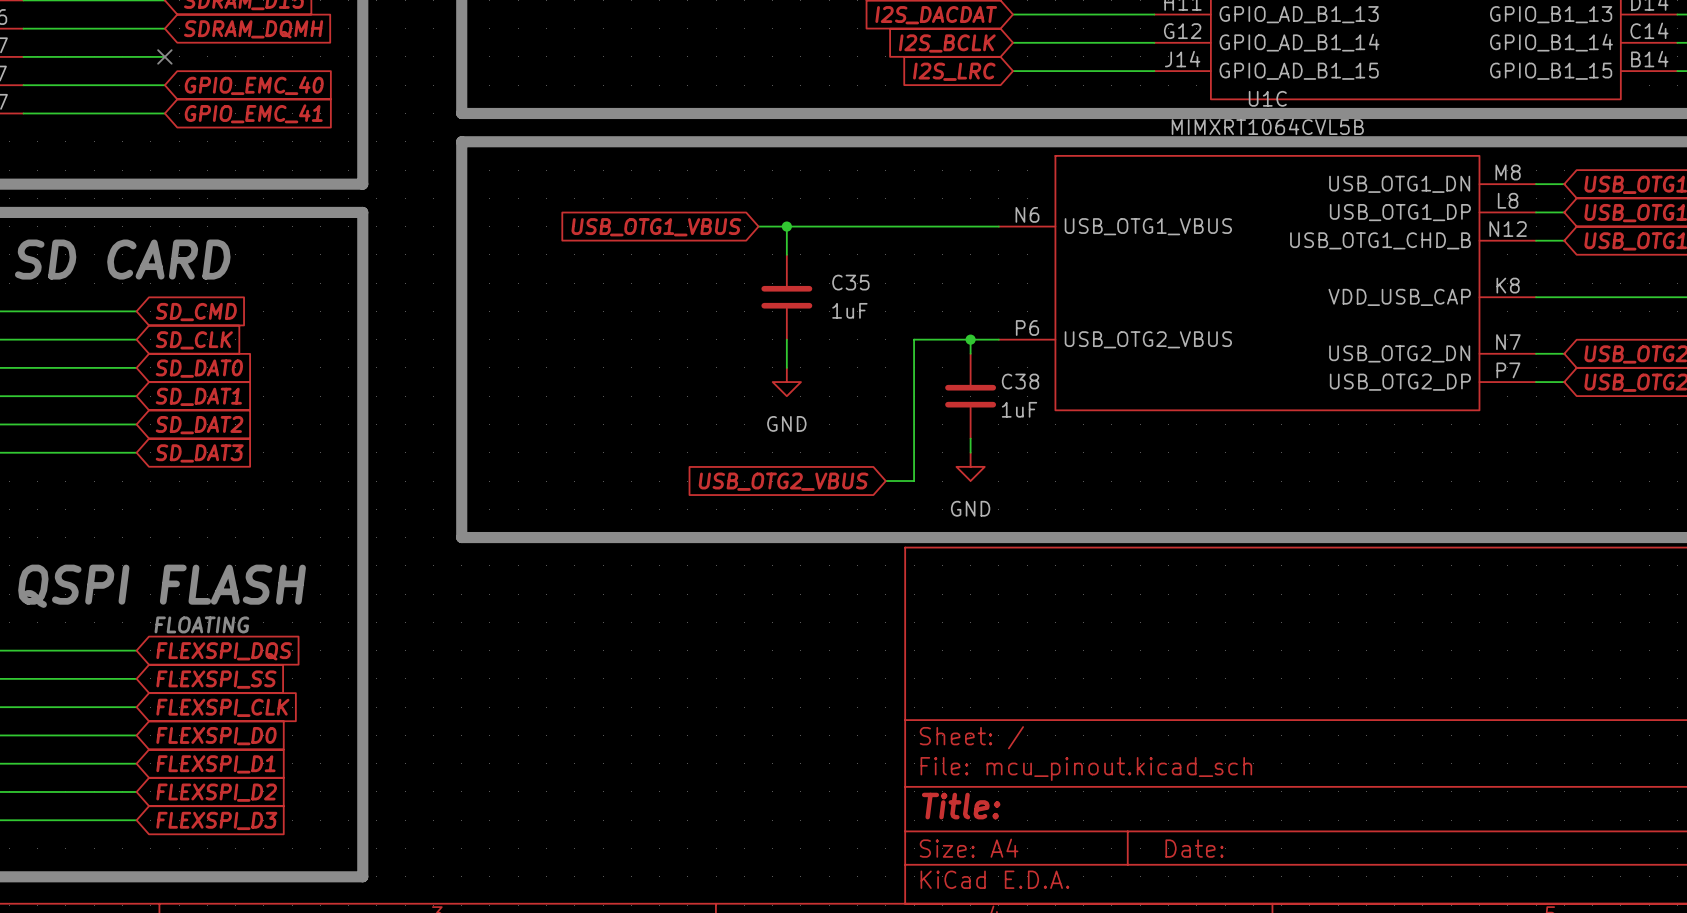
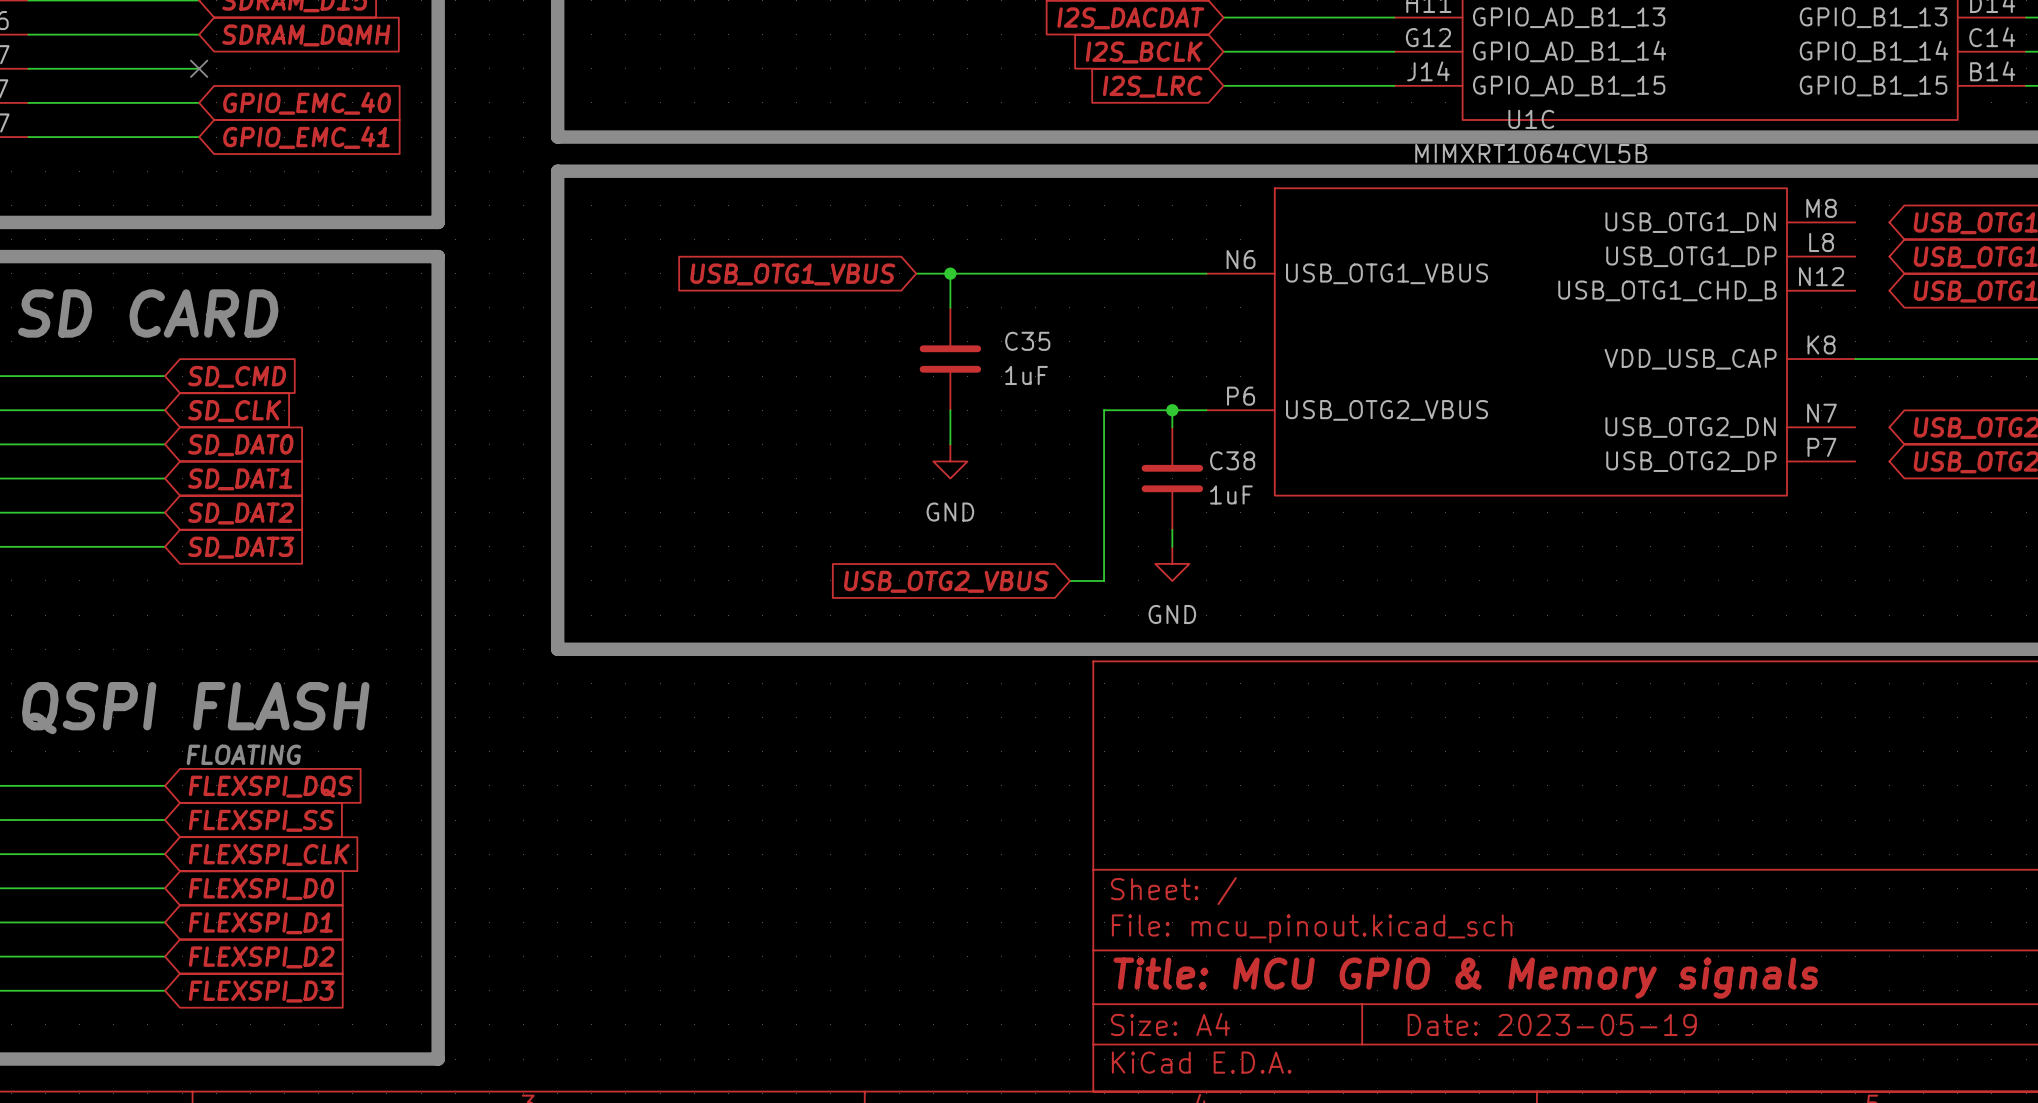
wire: (1536, 184) (1564, 184) -> none
wire: (1536, 212) (1564, 212) -> none
wire: (1536, 240) (1564, 240) -> none
wire: (1536, 353) (1564, 353) -> none
wire: (1536, 382) (1564, 382) -> none
title block: Title: (961, 806) -> Title: MCU GPIO & Memory signals (1465, 978)
title block: Date: (1194, 848) -> Date: 2023-05-19 (1552, 1024)

